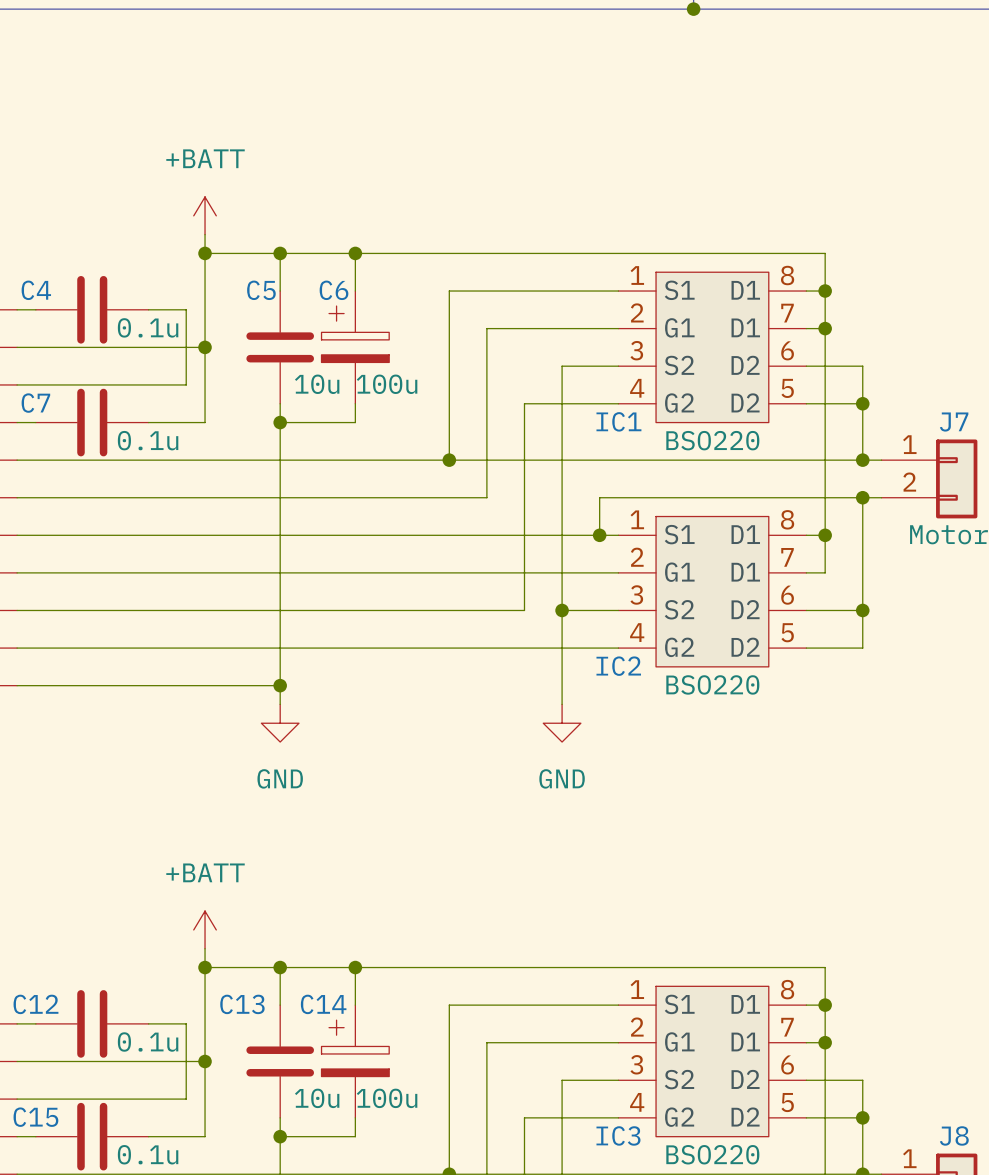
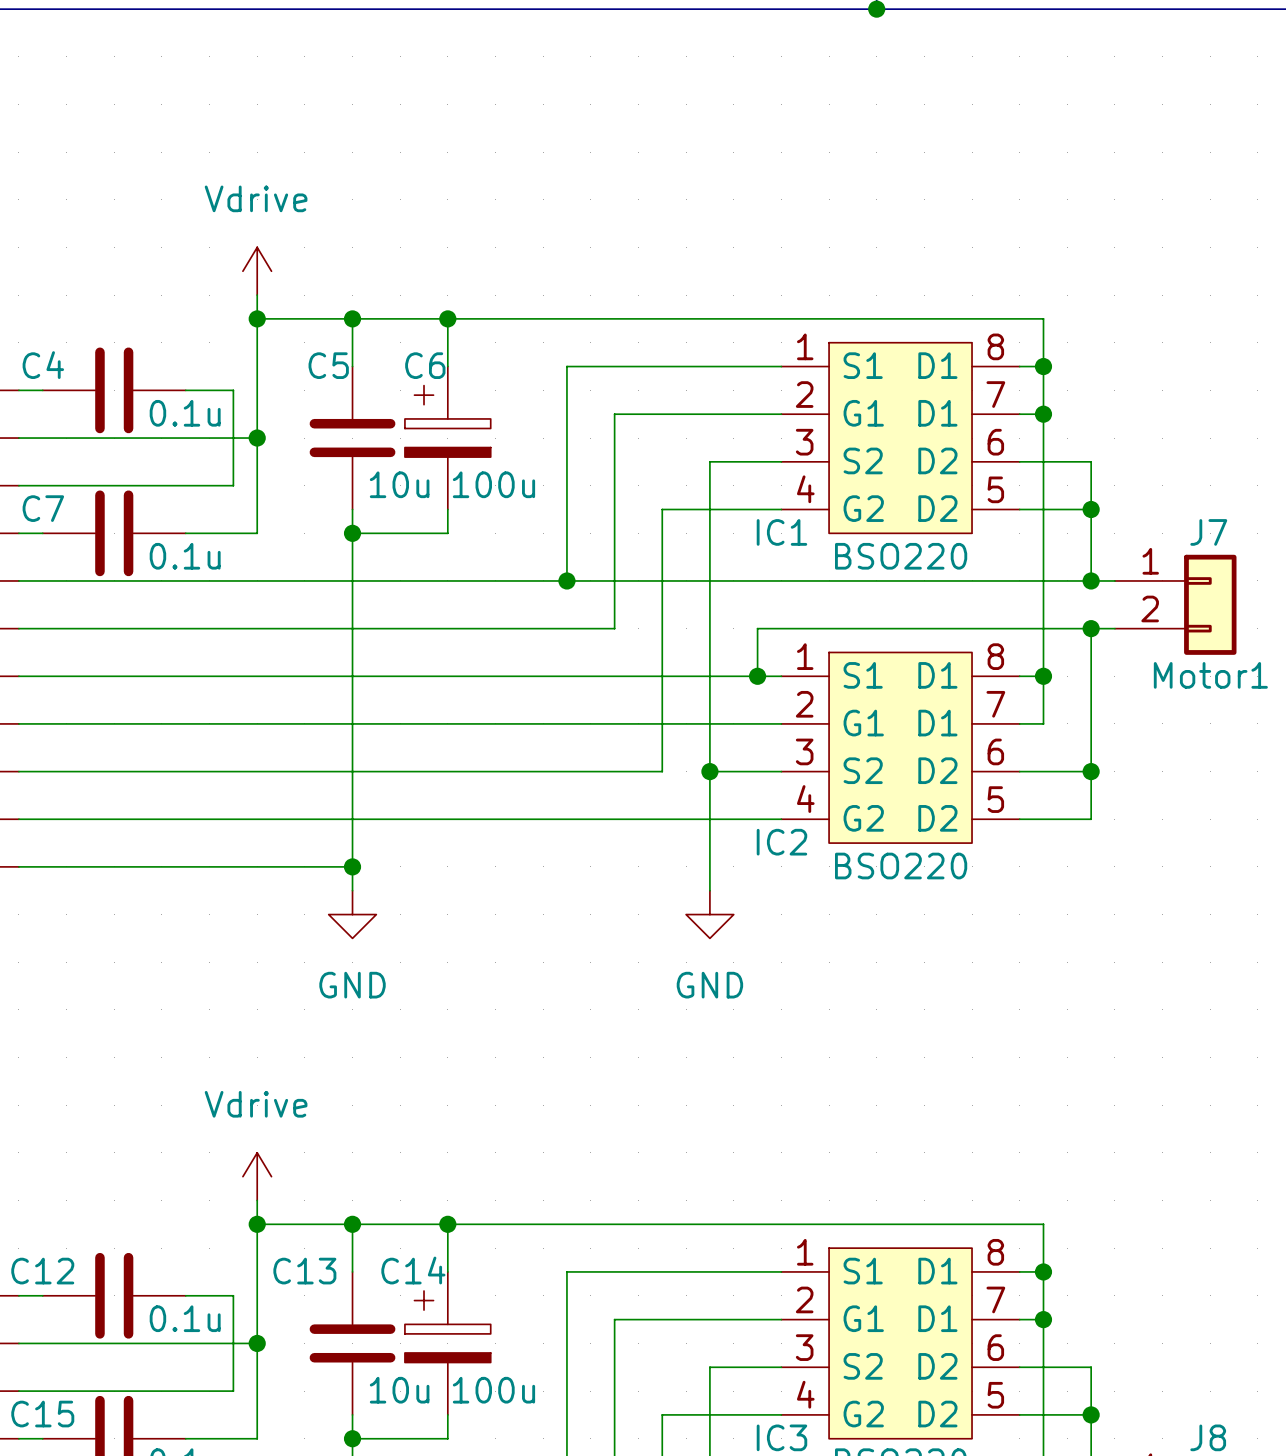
power symbol: +BATT (205, 215) -> Vdrive (257, 271)
power symbol: +BATT (205, 929) -> Vdrive (257, 1176)

